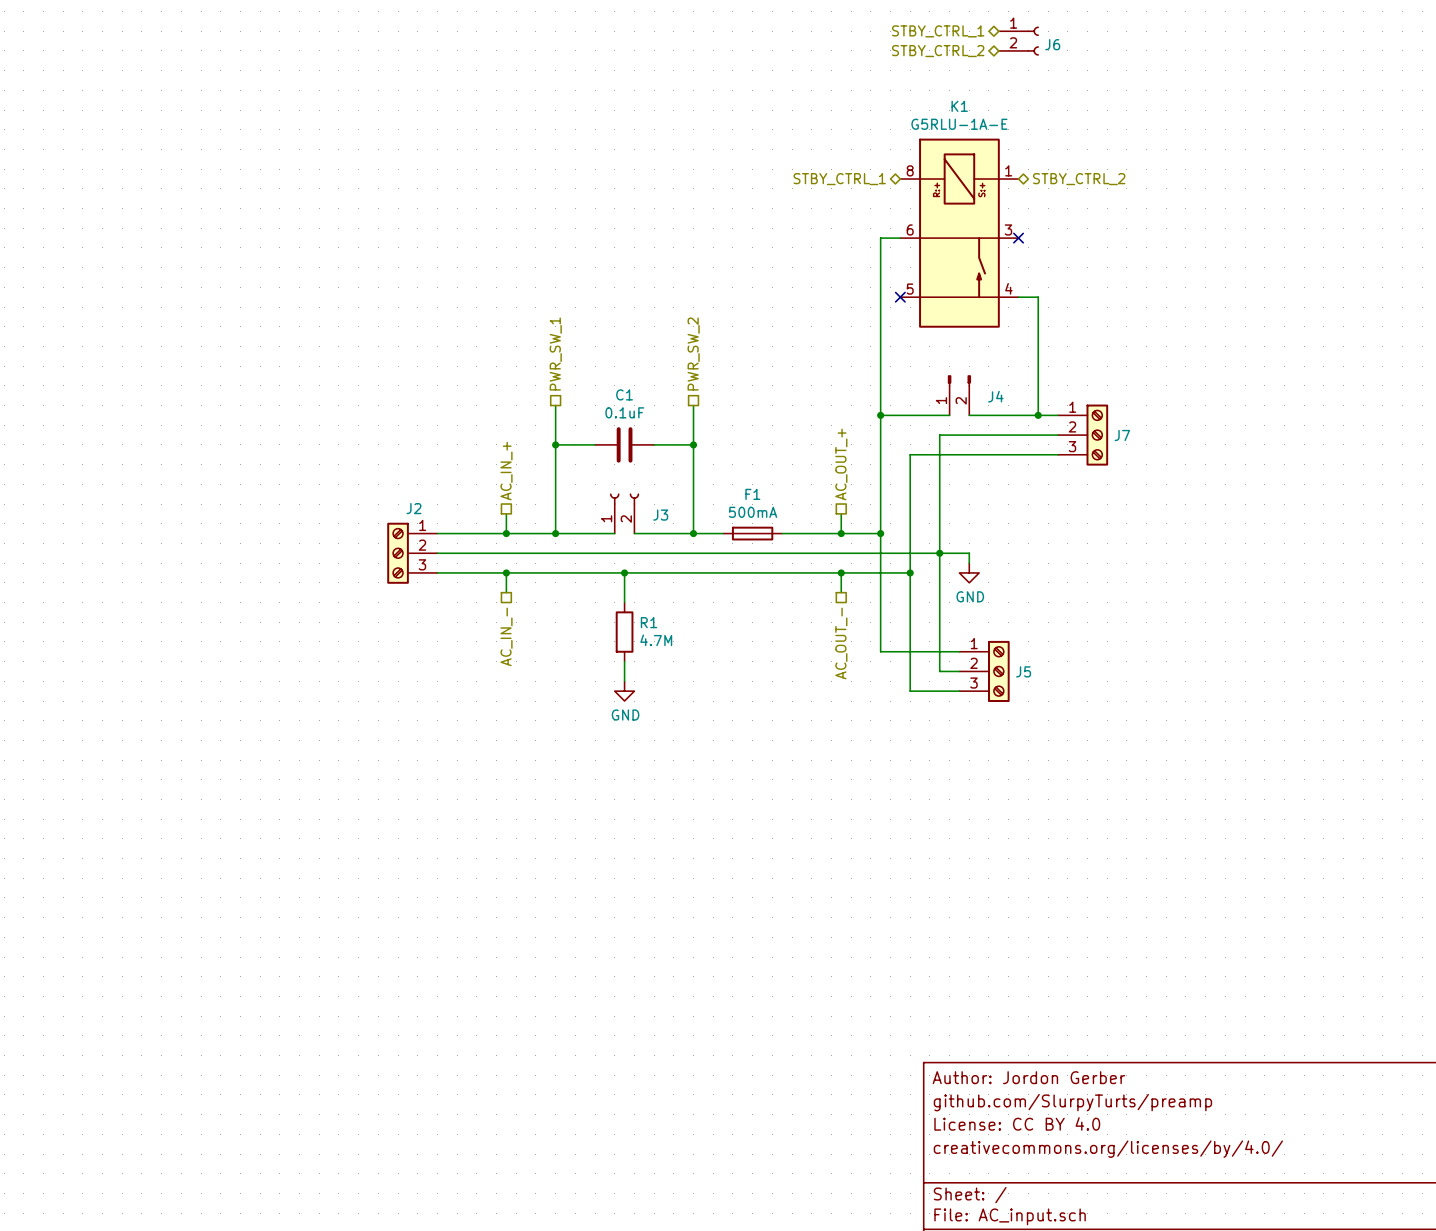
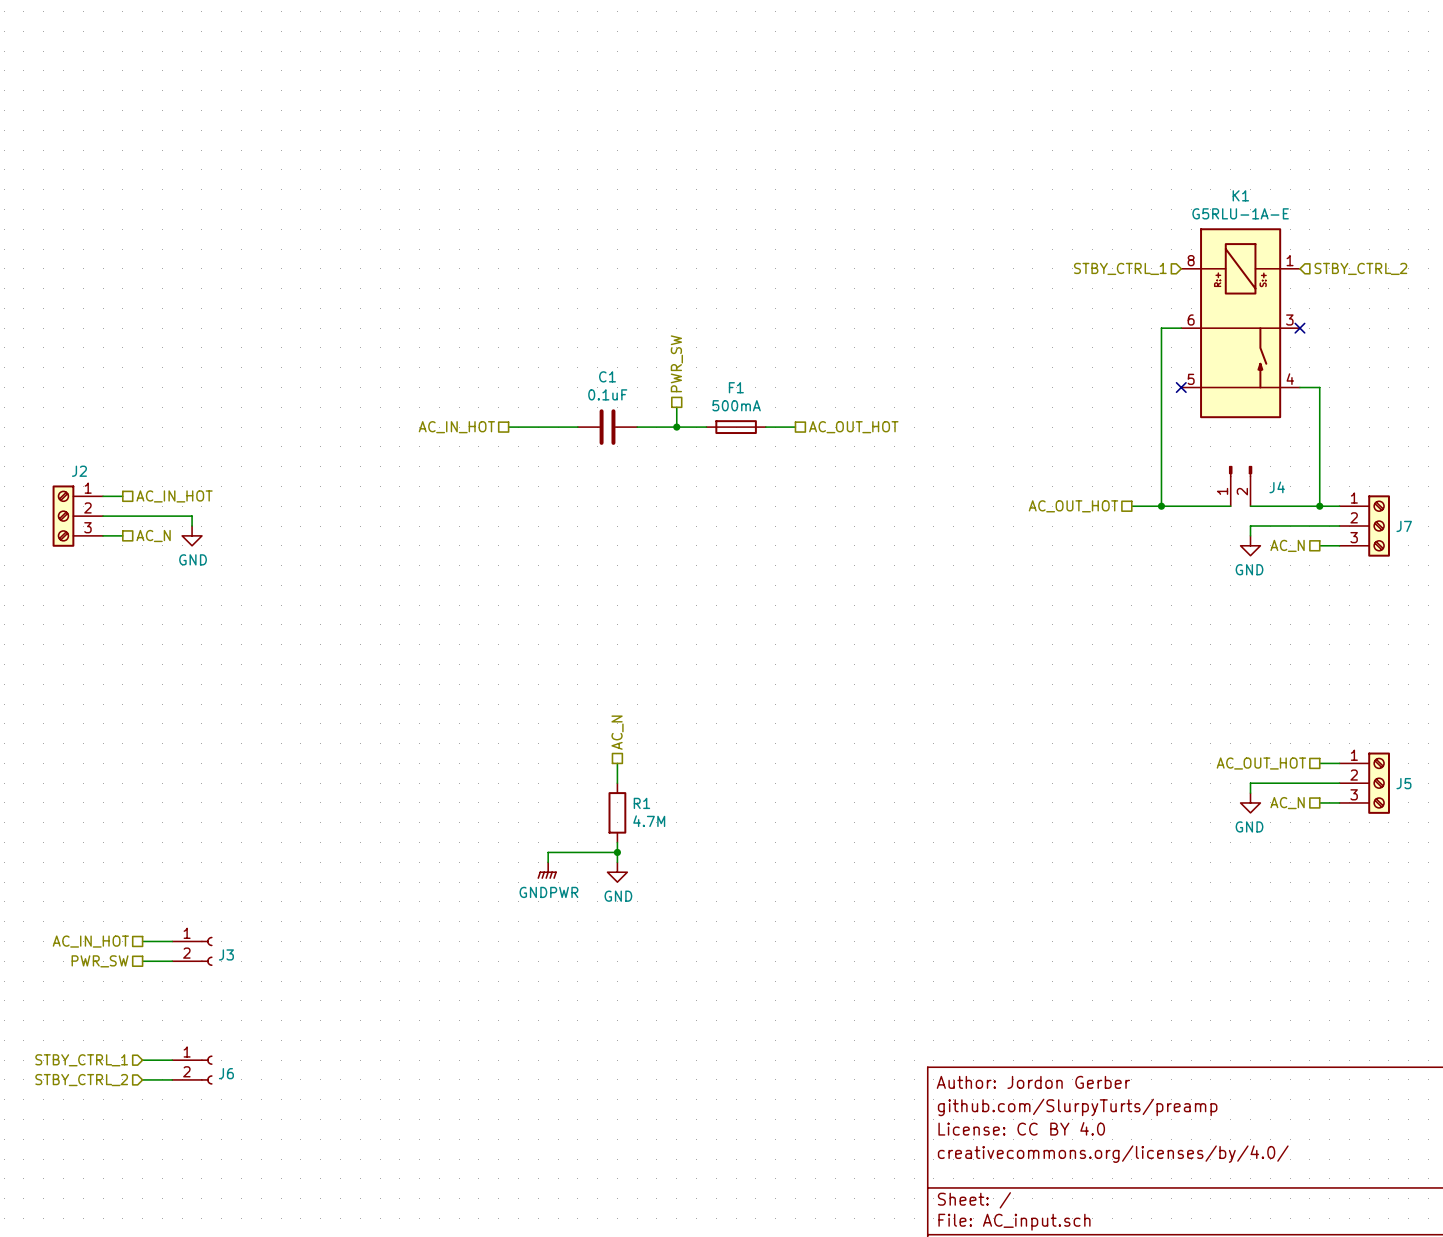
hierarchical label: STBY_CTRL_1 (938, 31) -> none
J6 position: (1018, 41) -> (192, 1070)
hierarchical label: STBY_CTRL_2 (938, 51) -> none
hierarchical label: STBY_CTRL_1 (839, 179) -> none
hierarchical label: STBY_CTRL_2 (1079, 179) -> none
K1 position: (959, 233) -> (1240, 323)
wire: (900, 238) (880, 238) (880, 651) (959, 651) -> none
no-connect mark: (1018, 238) -> none
hierarchical label: none -> STBY_CTRL_1 (1120, 268)
hierarchical label: none -> STBY_CTRL_2 (1360, 268)
no-connect mark: (900, 297) -> none
wire: (1018, 297) (1038, 297) (1038, 415) -> none
wire: none -> (1181, 328) (1161, 328) (1161, 506)
no-connect mark: none -> (1299, 328)
hierarchical label: PWR_SW_1 (555, 354) -> none
hierarchical label: PWR_SW_2 (693, 354) -> PWR_SW (676, 363)
no-connect mark: none -> (1181, 387)
wire: none -> (1299, 387) (1319, 387) (1319, 506)
J4 position: (959, 395) -> (1240, 486)
wire: (555, 405) (555, 533) -> none
wire: none -> (676, 407) (676, 427)
wire: (693, 405) (693, 533) -> none
wire: (880, 415) (949, 415) -> none
junction: (880, 415) -> none
wire: (969, 415) (1057, 415) -> none
junction: (1038, 415) -> none
hierarchical label: none -> AC_IN_HOT (456, 427)
wire: none -> (508, 427) (577, 427)
wire: none -> (637, 427) (706, 427)
wire: none -> (765, 427) (795, 427)
wire: (1057, 435) (939, 435) (939, 671) (959, 671) -> none
J7 position: (1083, 435) -> (1364, 526)
wire: (555, 444) (595, 444) -> none
junction: (555, 444) -> none
C1 position: (624, 444) -> (607, 427)
wire: (654, 444) (693, 444) -> none
junction position: (693, 444) -> (676, 427)
wire: (1057, 454) (910, 454) (910, 691) (959, 691) -> none
hierarchical label: AC_OUT_+ (841, 464) -> AC_OUT_HOT (853, 427)
hierarchical label: AC_IN_+ (506, 471) -> none
wire: none -> (103, 496) (122, 496)
hierarchical label: none -> AC_IN_HOT (174, 496)
J3 rotation: 0° (624, 499) -> 90° clockwise (206, 951)
hierarchical label: none -> AC_OUT_HOT (1073, 506)
wire: none -> (1131, 506) (1230, 506)
junction: none -> (1161, 506)
wire: none -> (1250, 506) (1339, 506)
junction: none -> (1319, 506)
wire: none -> (103, 516) (192, 516) (192, 526)
wire: (506, 513) (506, 533) -> none
J3 position: (624, 513) -> (192, 951)
wire: (841, 513) (841, 533) -> none
wire: none -> (1339, 526) (1250, 526) (1250, 535)
wire: none -> (103, 535) (122, 535)
hierarchical label: none -> AC_N (153, 536)
power symbol: none -> GND (192, 535)
wire: (437, 533) (614, 533) -> none
junction: (506, 533) -> none
junction: (555, 533) -> none
wire: (634, 533) (723, 533) -> none
junction: (693, 533) -> none
F1 position: (752, 533) -> (736, 427)
wire: (782, 533) (880, 533) -> none
junction: (841, 533) -> none
junction: (880, 533) -> none
power symbol: none -> GND (1250, 545)
hierarchical label: none -> AC_N (1287, 545)
wire: none -> (1319, 545) (1339, 545)
J2 position: (412, 553) -> (77, 516)
wire: (437, 553) (969, 553) (969, 563) -> none
junction: (939, 553) -> none
wire: (437, 572) (910, 572) -> none
wire: (506, 572) (506, 592) -> none
junction: (506, 572) -> none
wire: (624, 572) (624, 602) -> none
junction: (624, 572) -> none
wire: (841, 572) (841, 592) -> none
junction: (841, 572) -> none
junction: (910, 572) -> none
power symbol: GND (969, 572) -> none
R1 position: (624, 632) -> (617, 812)
hierarchical label: AC_IN_- (506, 636) -> none
hierarchical label: AC_OUT_- (841, 643) -> none
wire: (624, 661) (624, 681) -> (617, 763) (617, 783)
J5 position: (984, 671) -> (1364, 783)
power symbol position: GND (624, 691) -> GND (617, 872)
hierarchical label: none -> AC_N (617, 732)
hierarchical label: none -> AC_OUT_HOT (1261, 763)
wire: none -> (1319, 763) (1339, 763)
wire: none -> (1339, 783) (1250, 783) (1250, 793)
power symbol: none -> GND (1250, 802)
hierarchical label: none -> AC_N (1287, 803)
wire: none -> (1319, 802) (1339, 802)
wire: none -> (617, 842) (617, 862)
wire: none -> (617, 852) (548, 852) (548, 862)
junction: none -> (617, 852)
power symbol: none -> GNDPWR (547, 870)
hierarchical label: none -> AC_IN_HOT (90, 941)
wire: none -> (142, 941) (172, 941)
hierarchical label: none -> PWR_SW (100, 961)
wire: none -> (142, 961) (172, 961)
hierarchical label: none -> STBY_CTRL_1 (81, 1060)
wire: none -> (142, 1060) (172, 1060)
hierarchical label: none -> STBY_CTRL_2 (81, 1080)
wire: none -> (142, 1079) (172, 1079)

